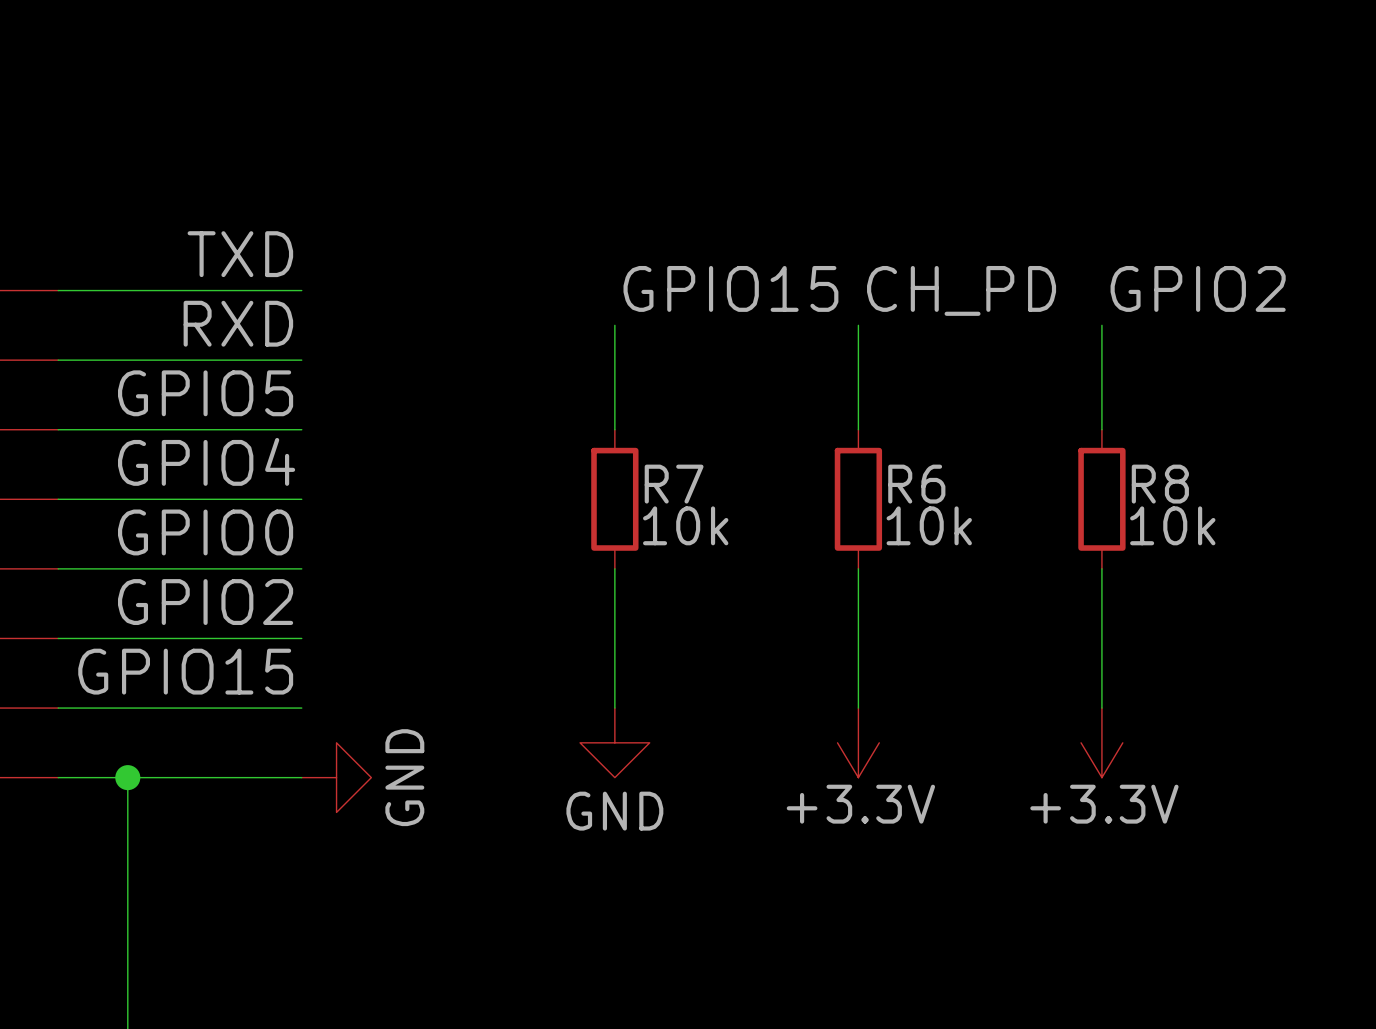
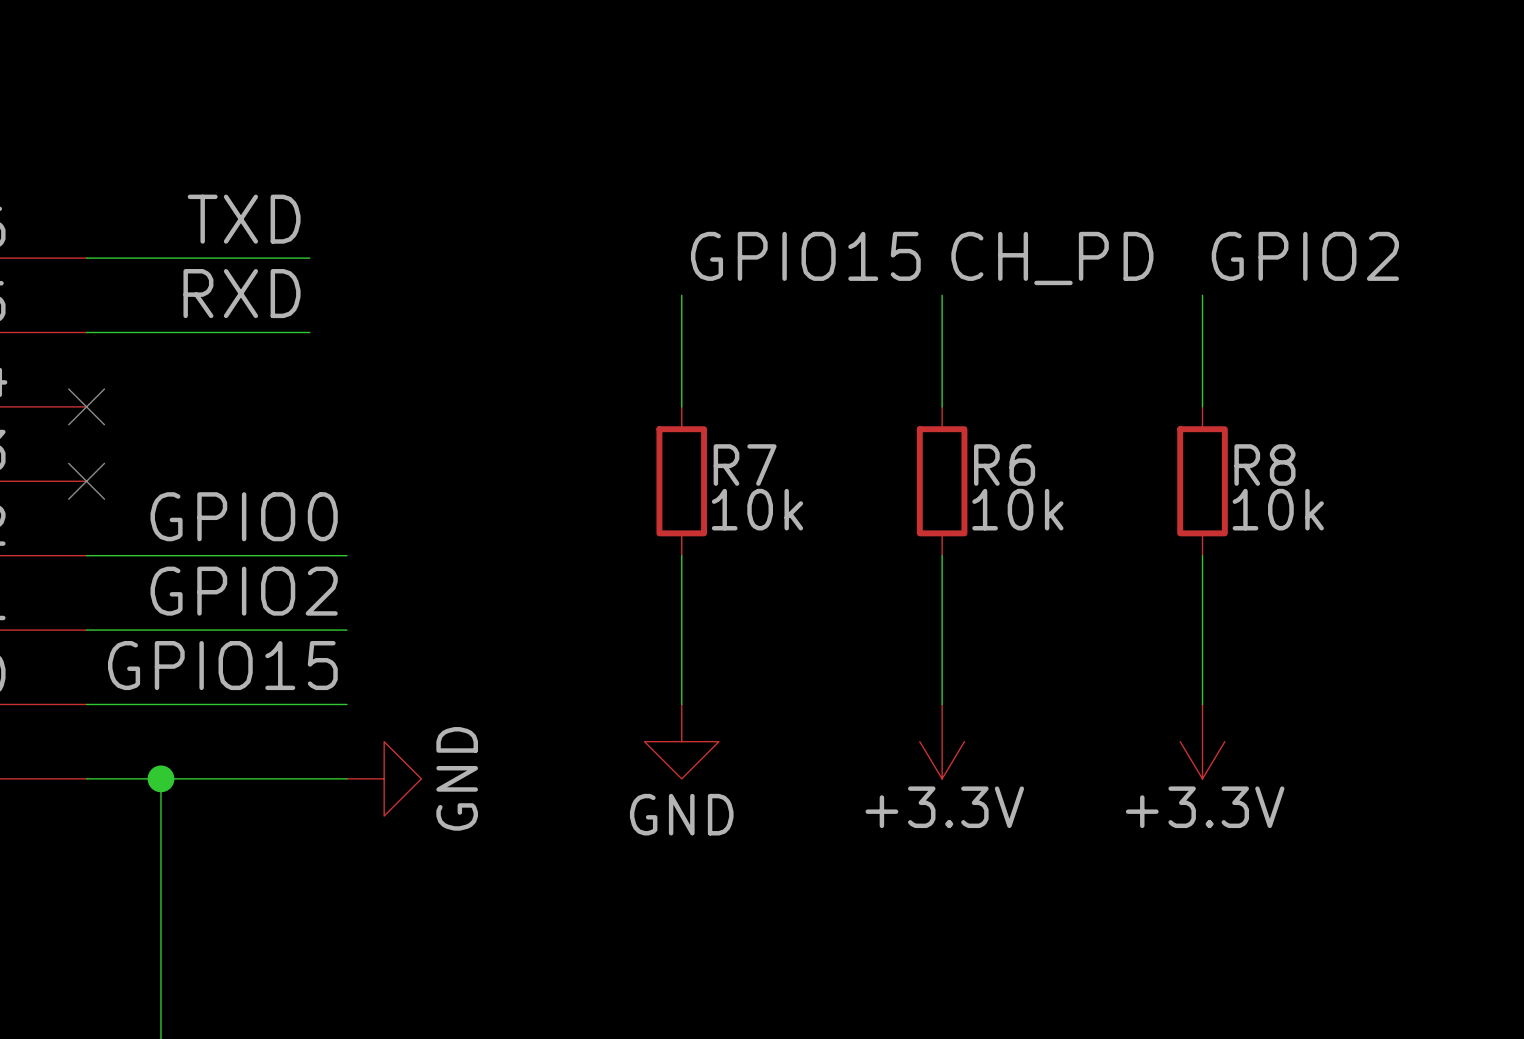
label position: TXD (240, 254) -> TXD (244, 219)
wire: (266, 290) (301, 290) -> none
label position: RXD (238, 323) -> RXD (242, 293)
wire: (266, 360) (301, 360) -> none
label: GPIO5 (205, 393) -> none
wire: (58, 429) (301, 429) -> none
no-connect mark: none -> (86, 406)
label: GPIO4 (206, 461) -> none
wire: (58, 499) (301, 499) -> none
no-connect mark: none -> (86, 481)

